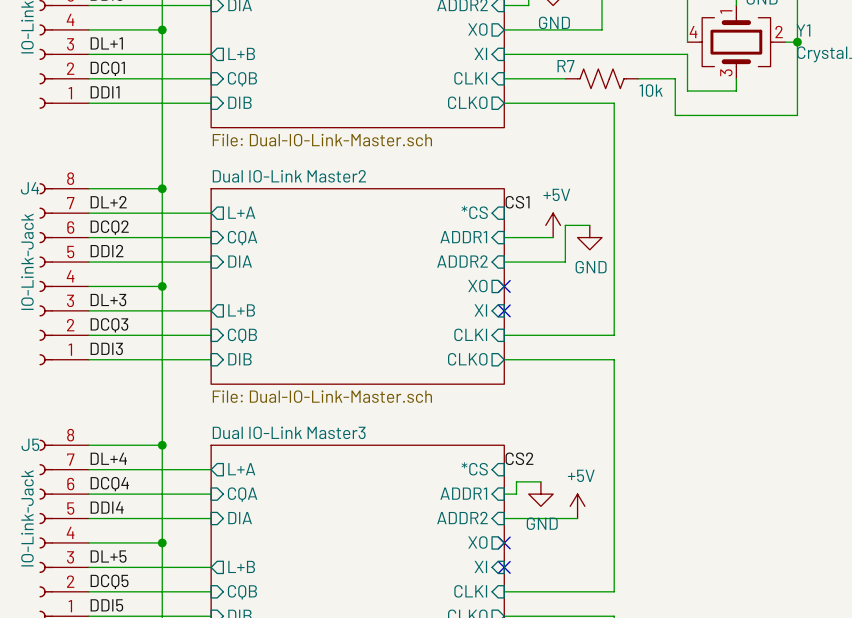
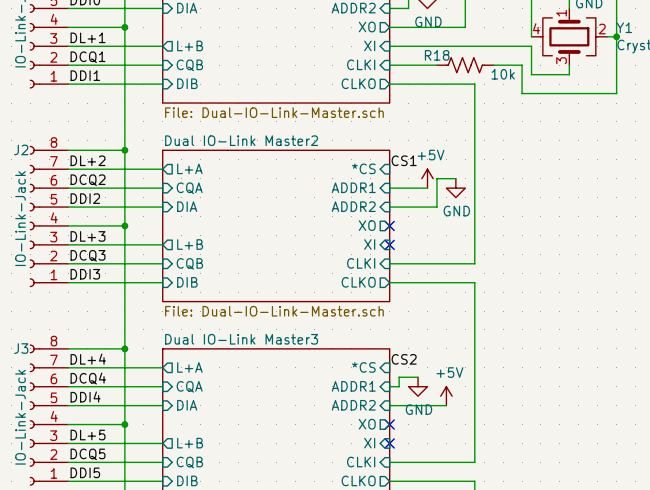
R7 name: R7 (565, 66) -> R18 (437, 55)
J4 name: J4 (30, 188) -> J2 (21, 149)
J5 name: J5 (30, 444) -> J3 (21, 348)

